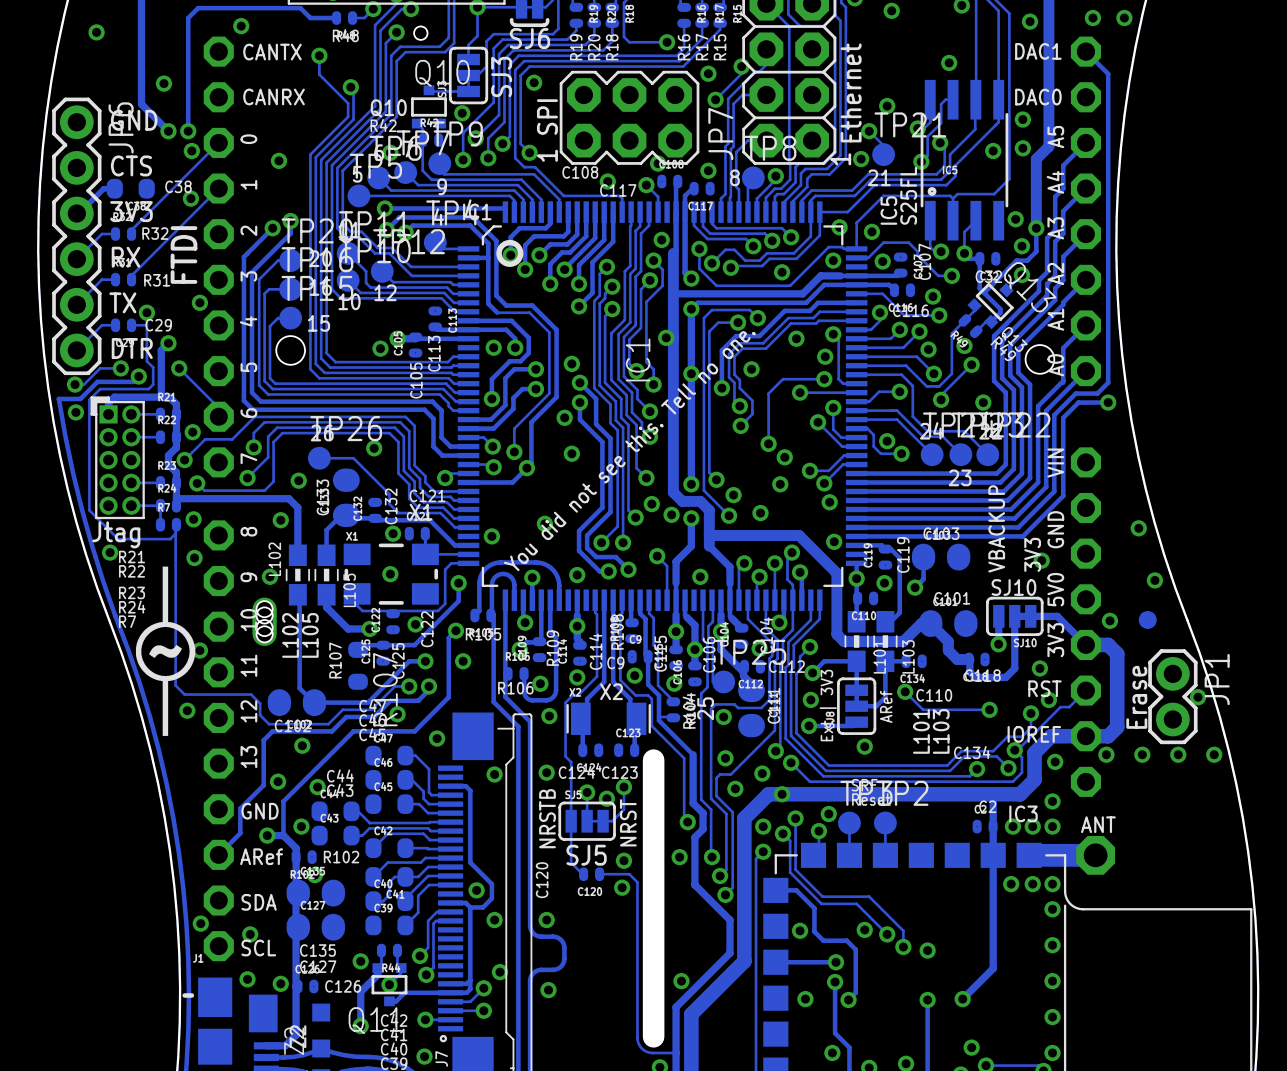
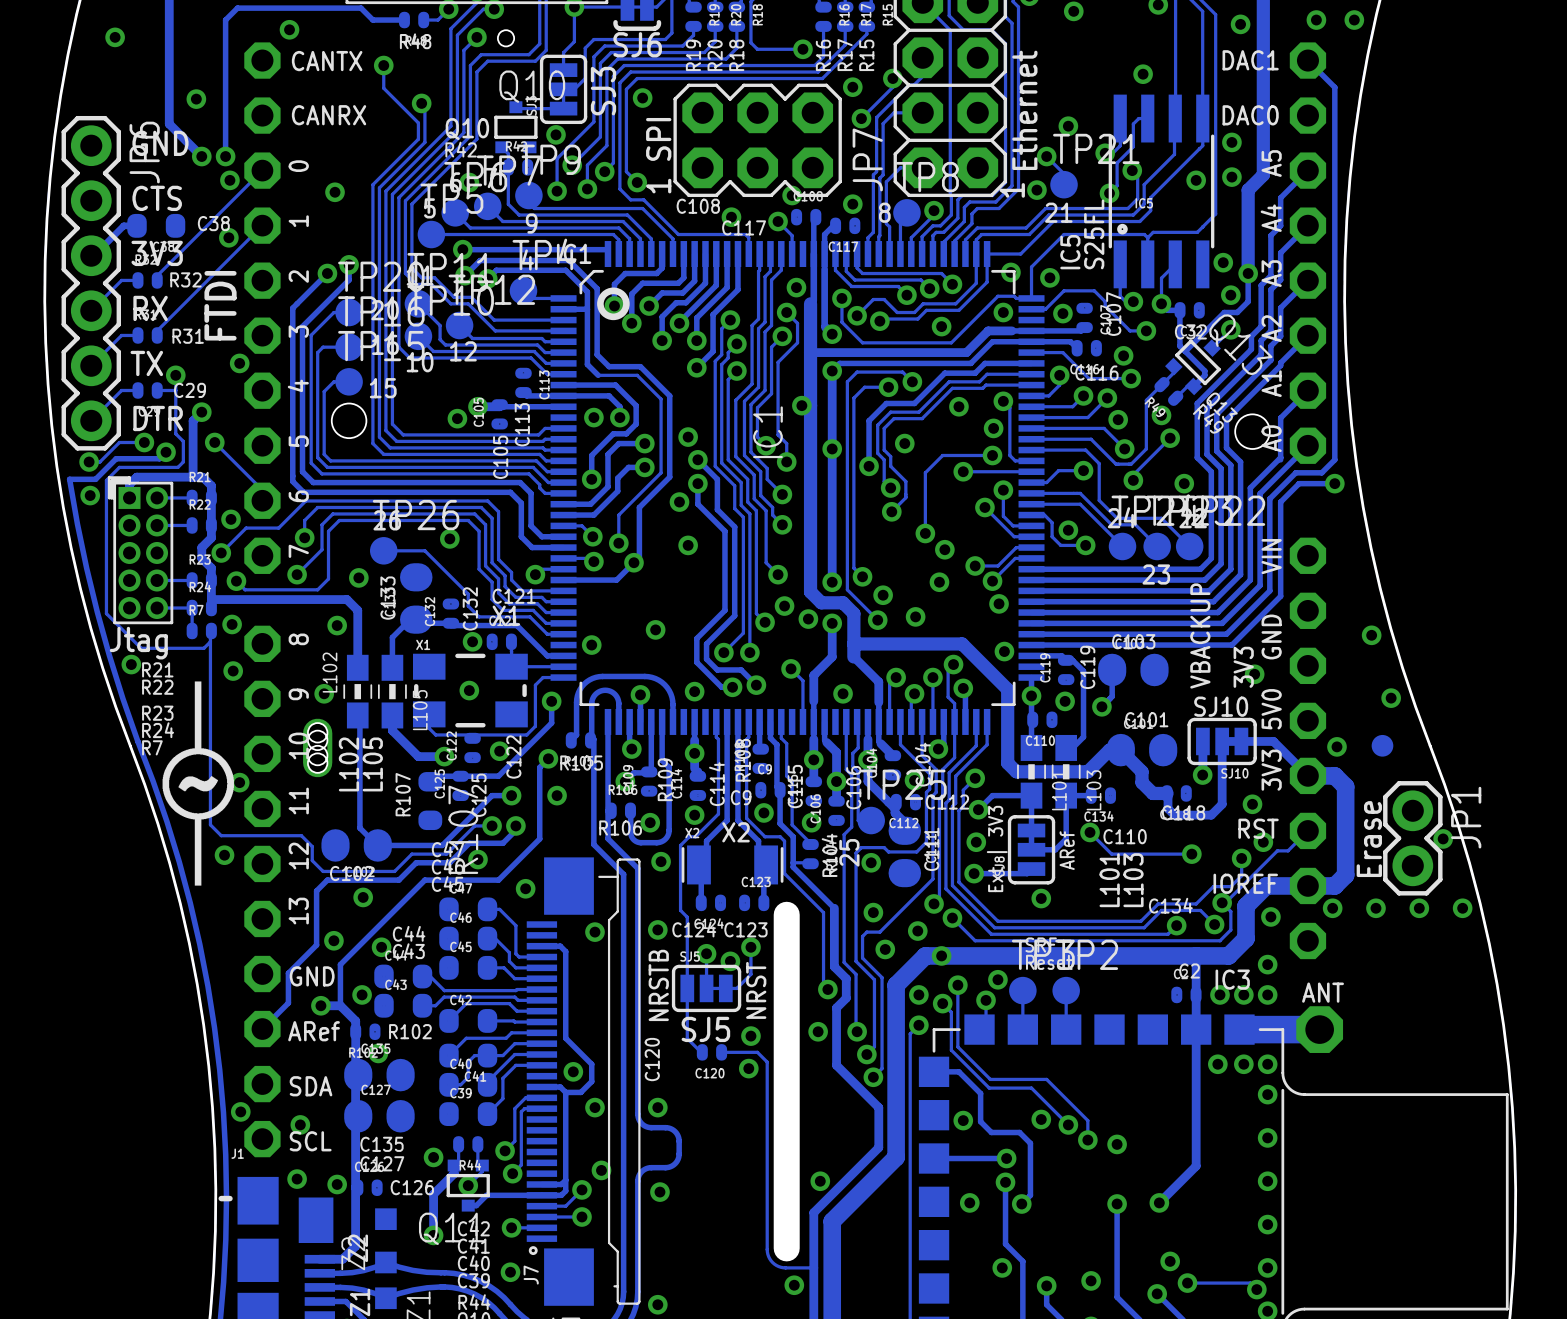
text: You did not see this. Tell no one. (629, 451) -> none

